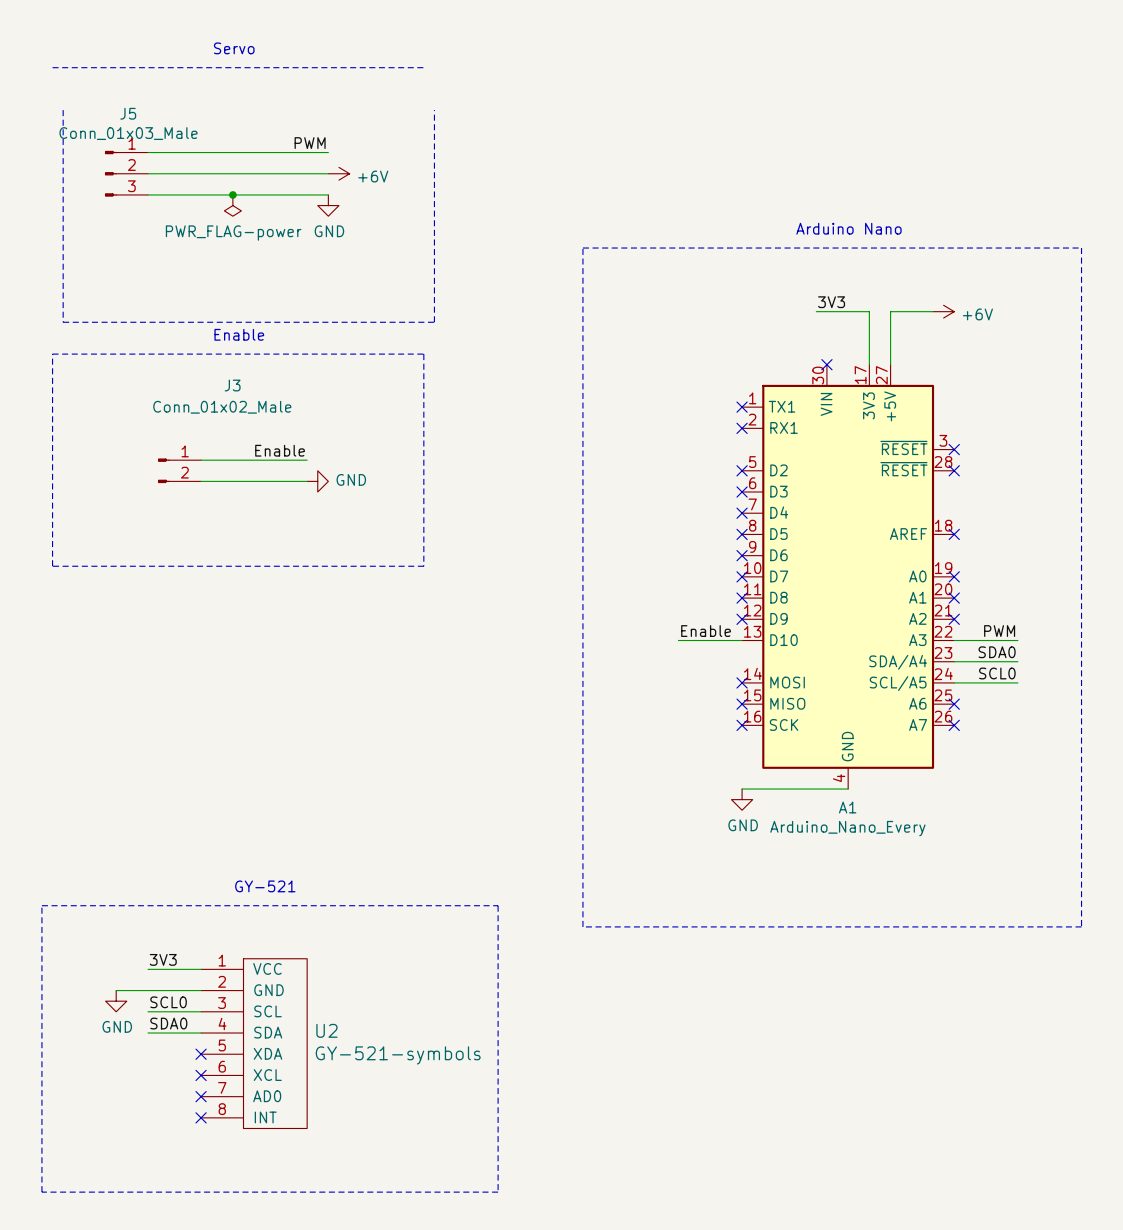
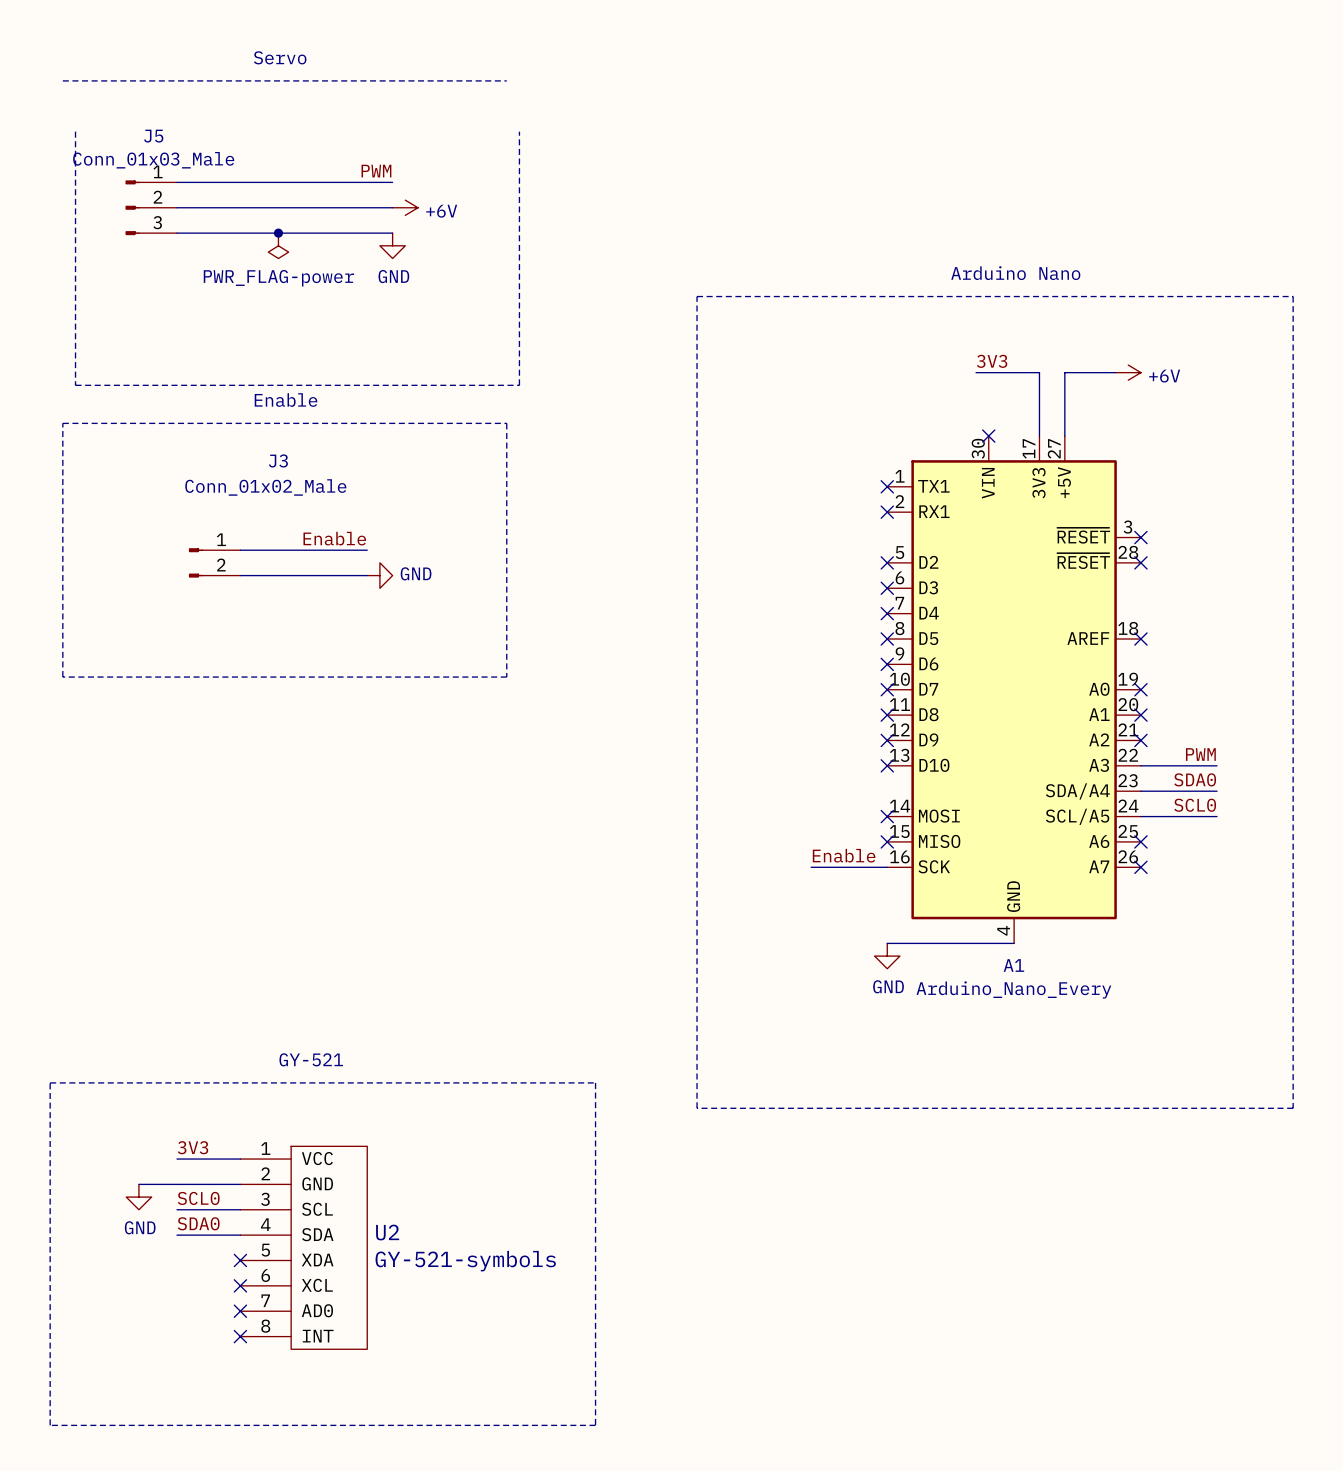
label position: Enable (706, 631) -> Enable (844, 855)
wire: (678, 640) (742, 640) -> (811, 867) (887, 867)
no-connect mark: none -> (887, 765)
no-connect mark: (742, 725) -> none

